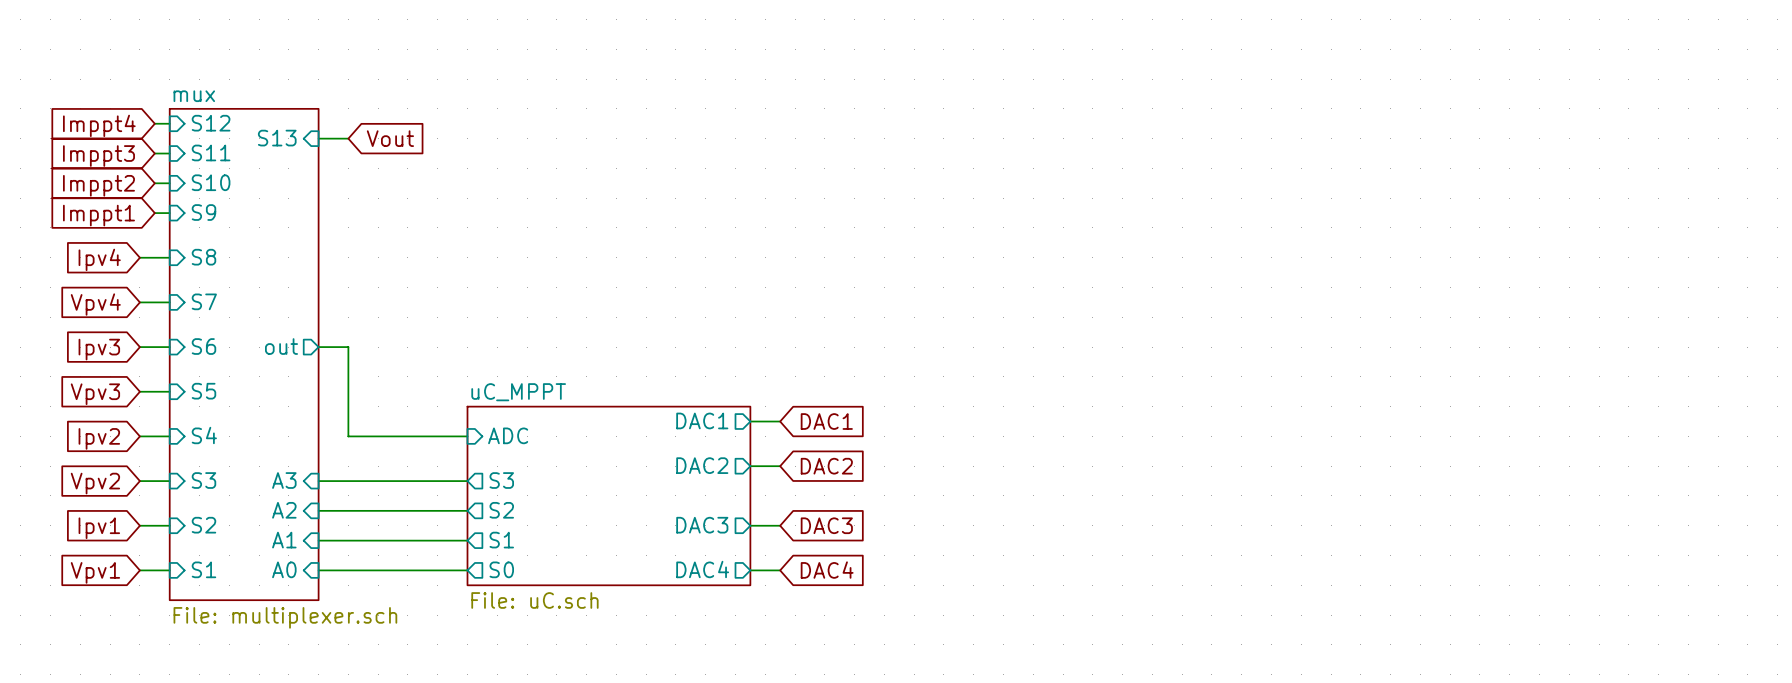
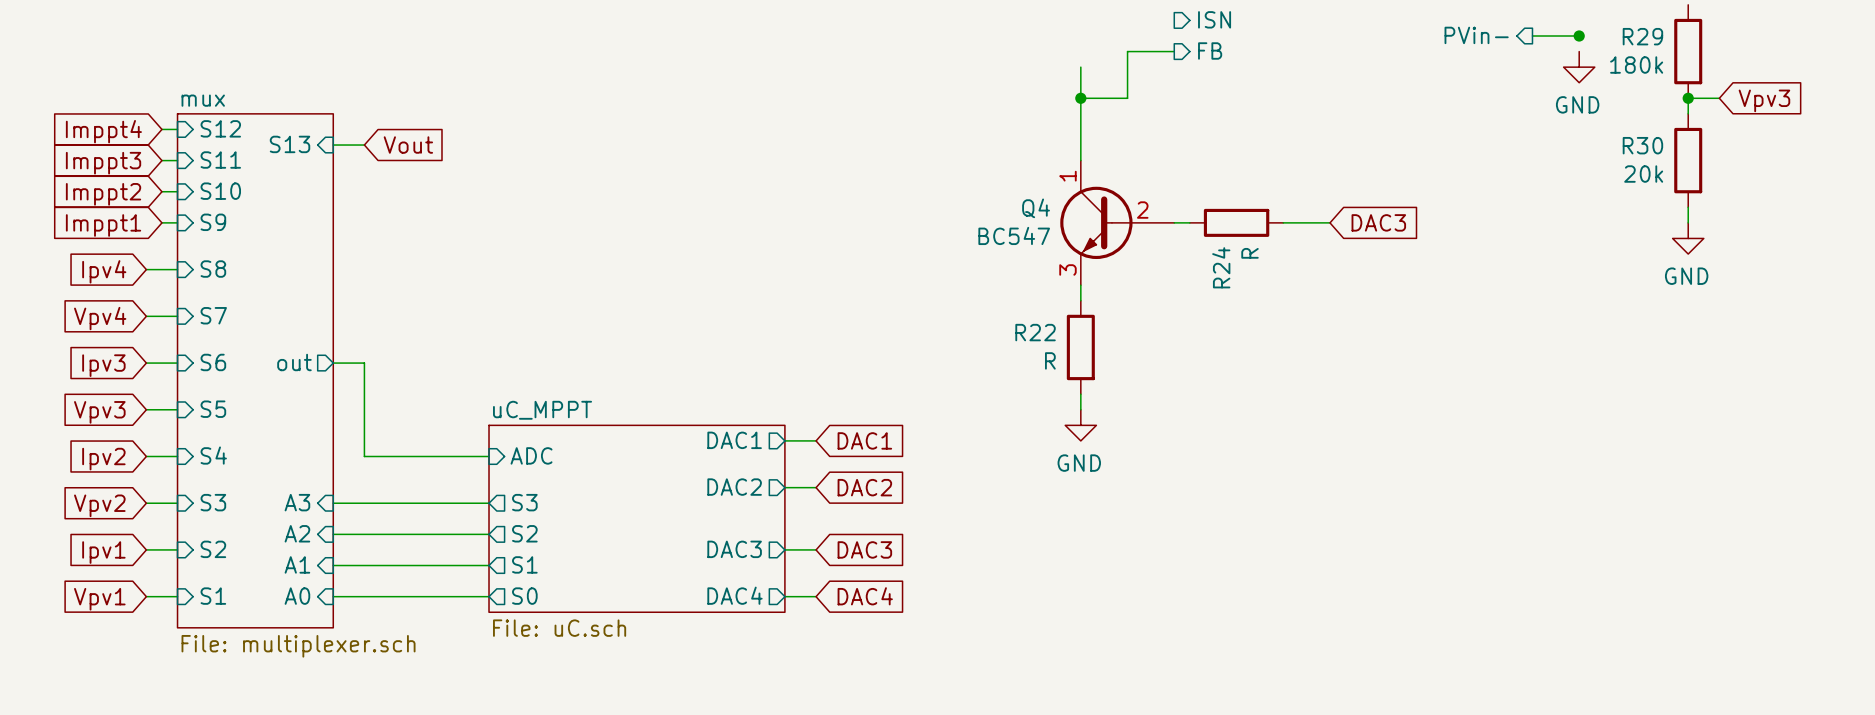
sheet pin: none -> ISN (1214, 19)
sheet pin: none -> PVin- (1476, 35)
wire: none -> (1532, 36) (1579, 36)
junction: none -> (1579, 36)
sheet pin: none -> FB (1210, 50)
wire: none -> (1174, 51) (1127, 51) (1127, 98) (1080, 98)
R29: none -> 180k (1688, 51)
wire: none -> (1080, 67) (1080, 160)
power symbol: none -> GND (1579, 67)
junction: none -> (1080, 98)
junction: none -> (1688, 98)
wire: none -> (1719, 98) (1688, 98) (1688, 113)
global label: none -> Vpv3 (1764, 100)
R30: none -> 20k (1688, 160)
wire: none -> (1688, 207) (1688, 222)
Q4: none -> BC547 (1117, 222)
wire: none -> (1174, 222) (1189, 222)
R24: none -> R (1236, 222)
wire: none -> (1283, 222) (1330, 222)
global label: none -> DAC3 (1378, 222)
power symbol: none -> GND (1688, 238)
wire: none -> (1080, 285) (1080, 300)
R22: none -> R (1080, 347)
wire: none -> (1080, 394) (1080, 409)
power symbol: none -> GND (1080, 425)

